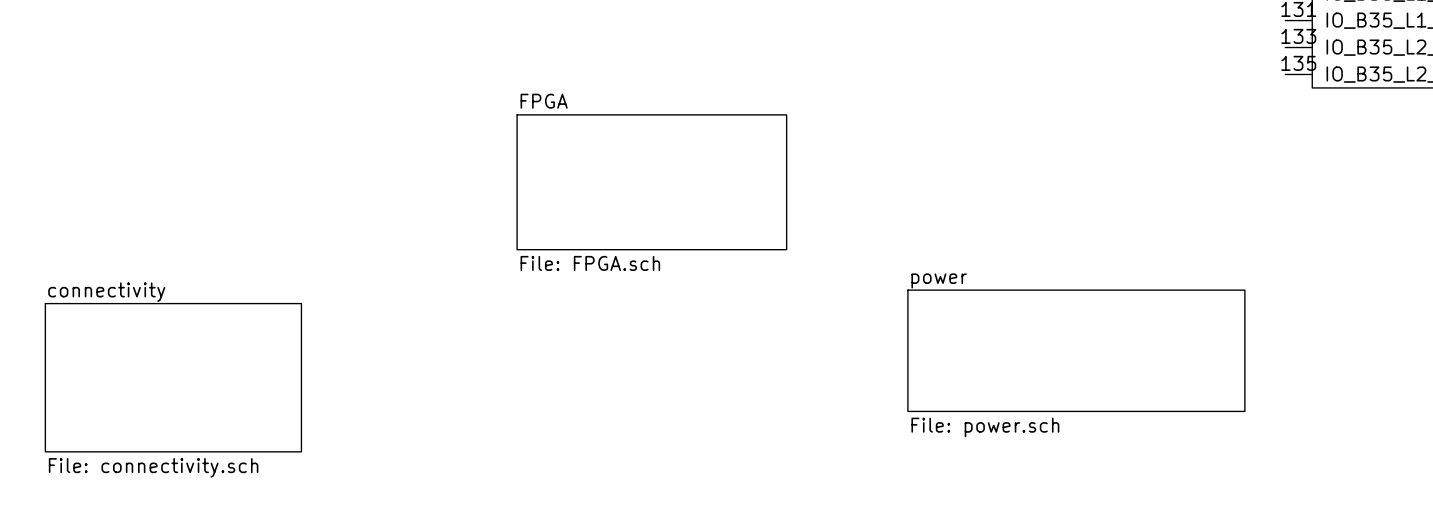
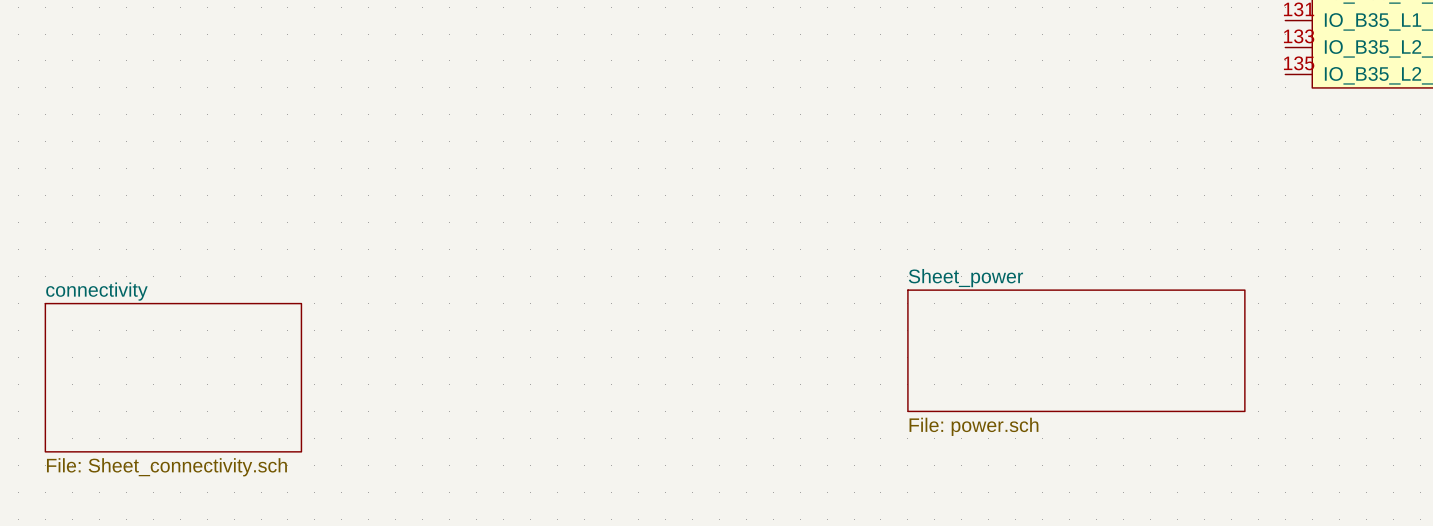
sheet FPGA: File: FPGA.sch (651, 182) -> none
sheet power name: power (939, 280) -> Sheet_power (965, 278)
sheet connectivity value: File: connectivity.sch (153, 467) -> File: Sheet_connectivity.sch (166, 467)

